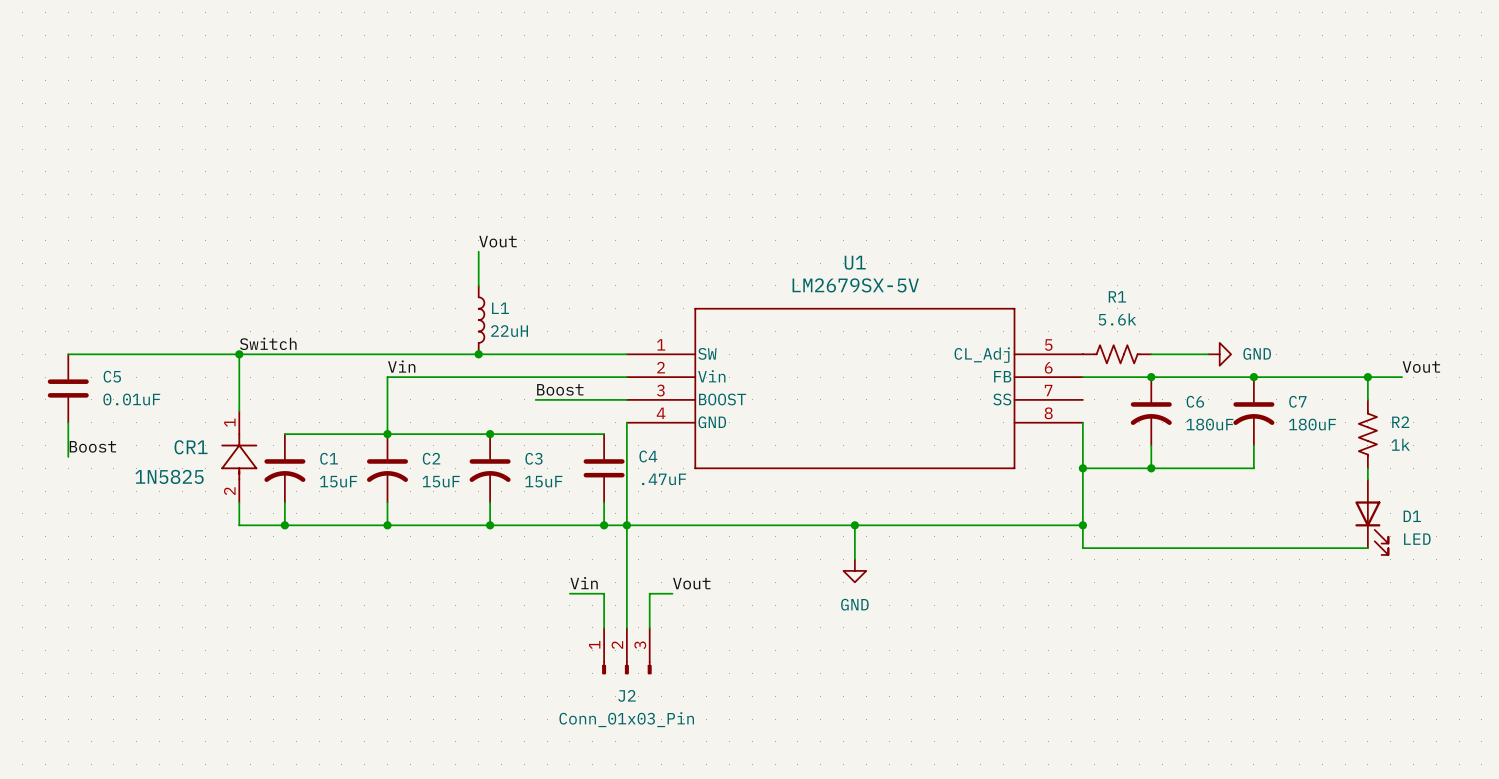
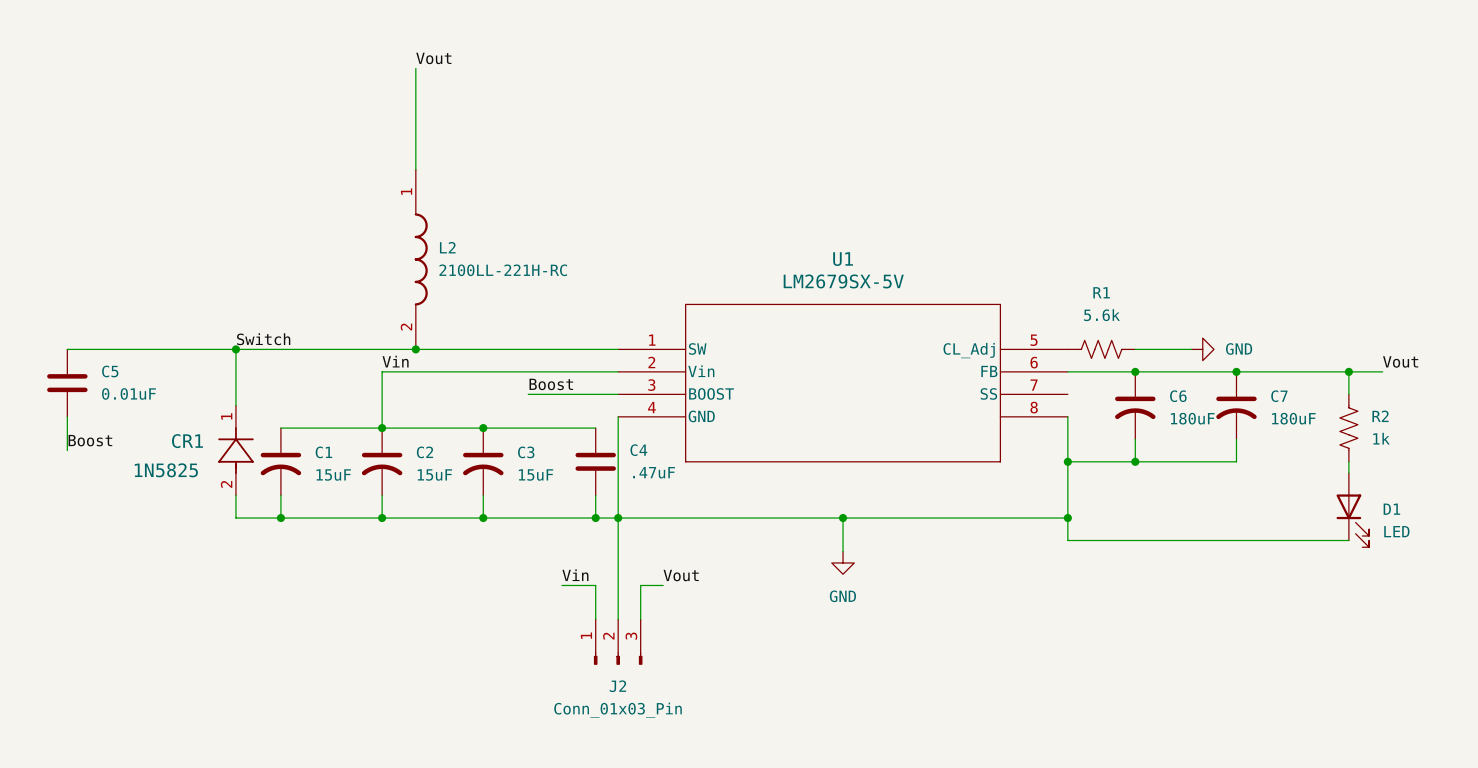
wire: none -> (415, 68) (415, 169)
label position: Vout (497, 241) -> Vout (433, 58)
wire: (478, 251) (478, 285) -> none
L2: none -> 2100LL-221H-RC (421, 259)
L1: 22uH (481, 320) -> none
junction: none -> (415, 349)
junction: (478, 354) -> none

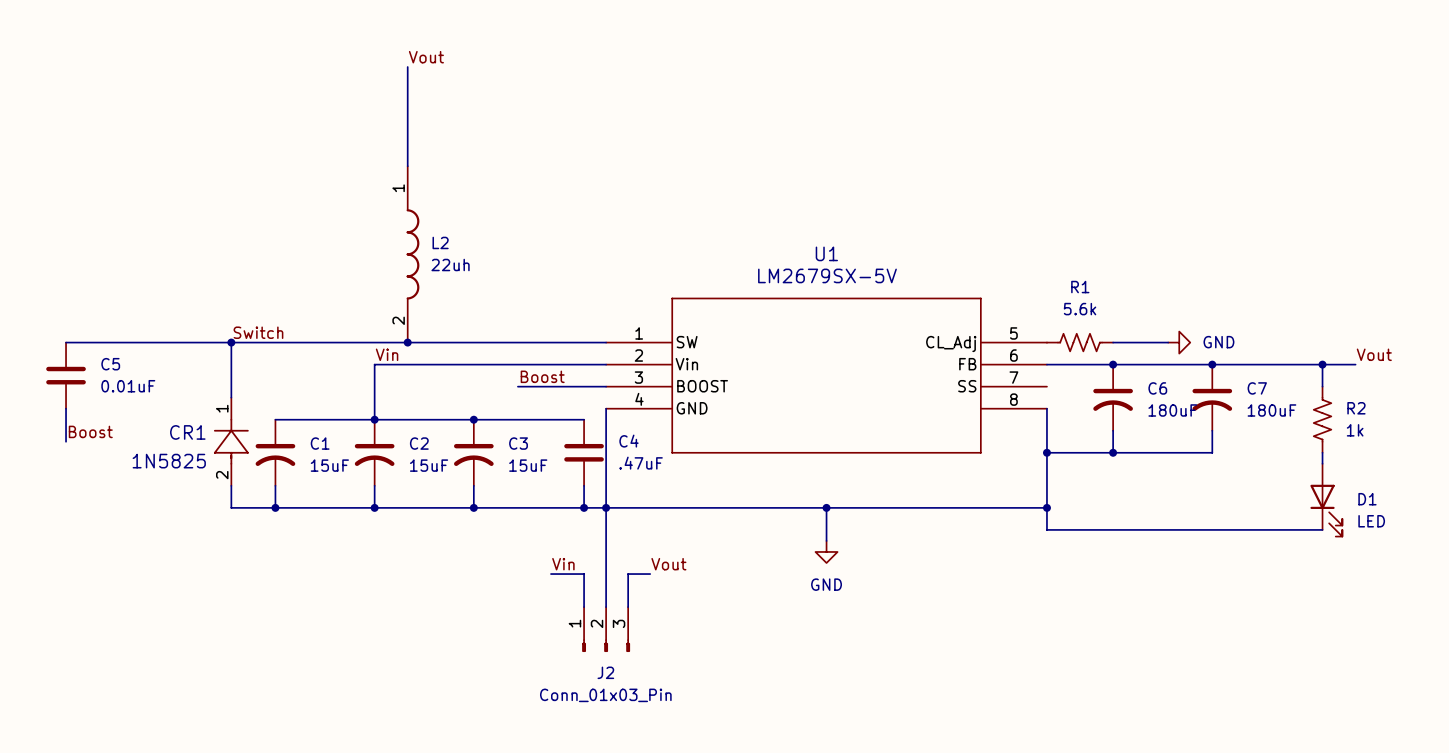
L2 value: 2100LL-221H-RC (503, 270) -> 22uh (450, 265)

